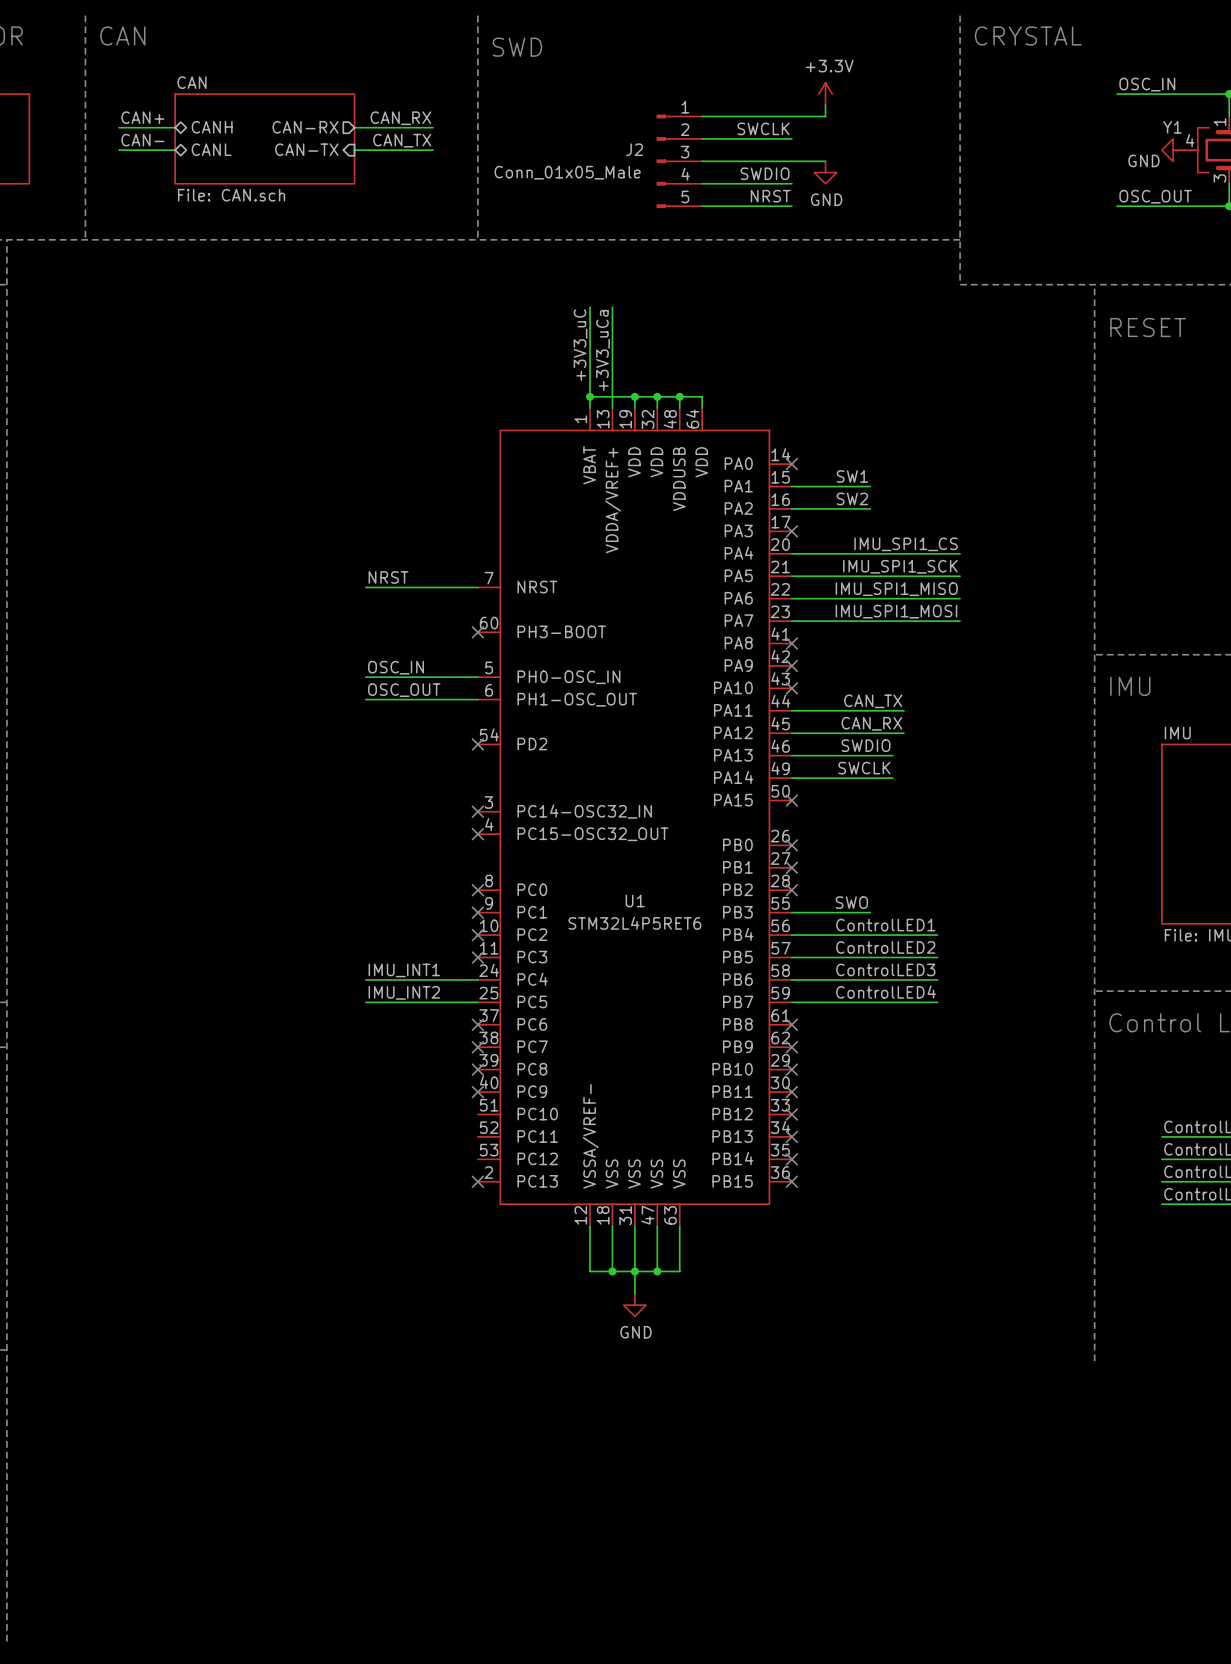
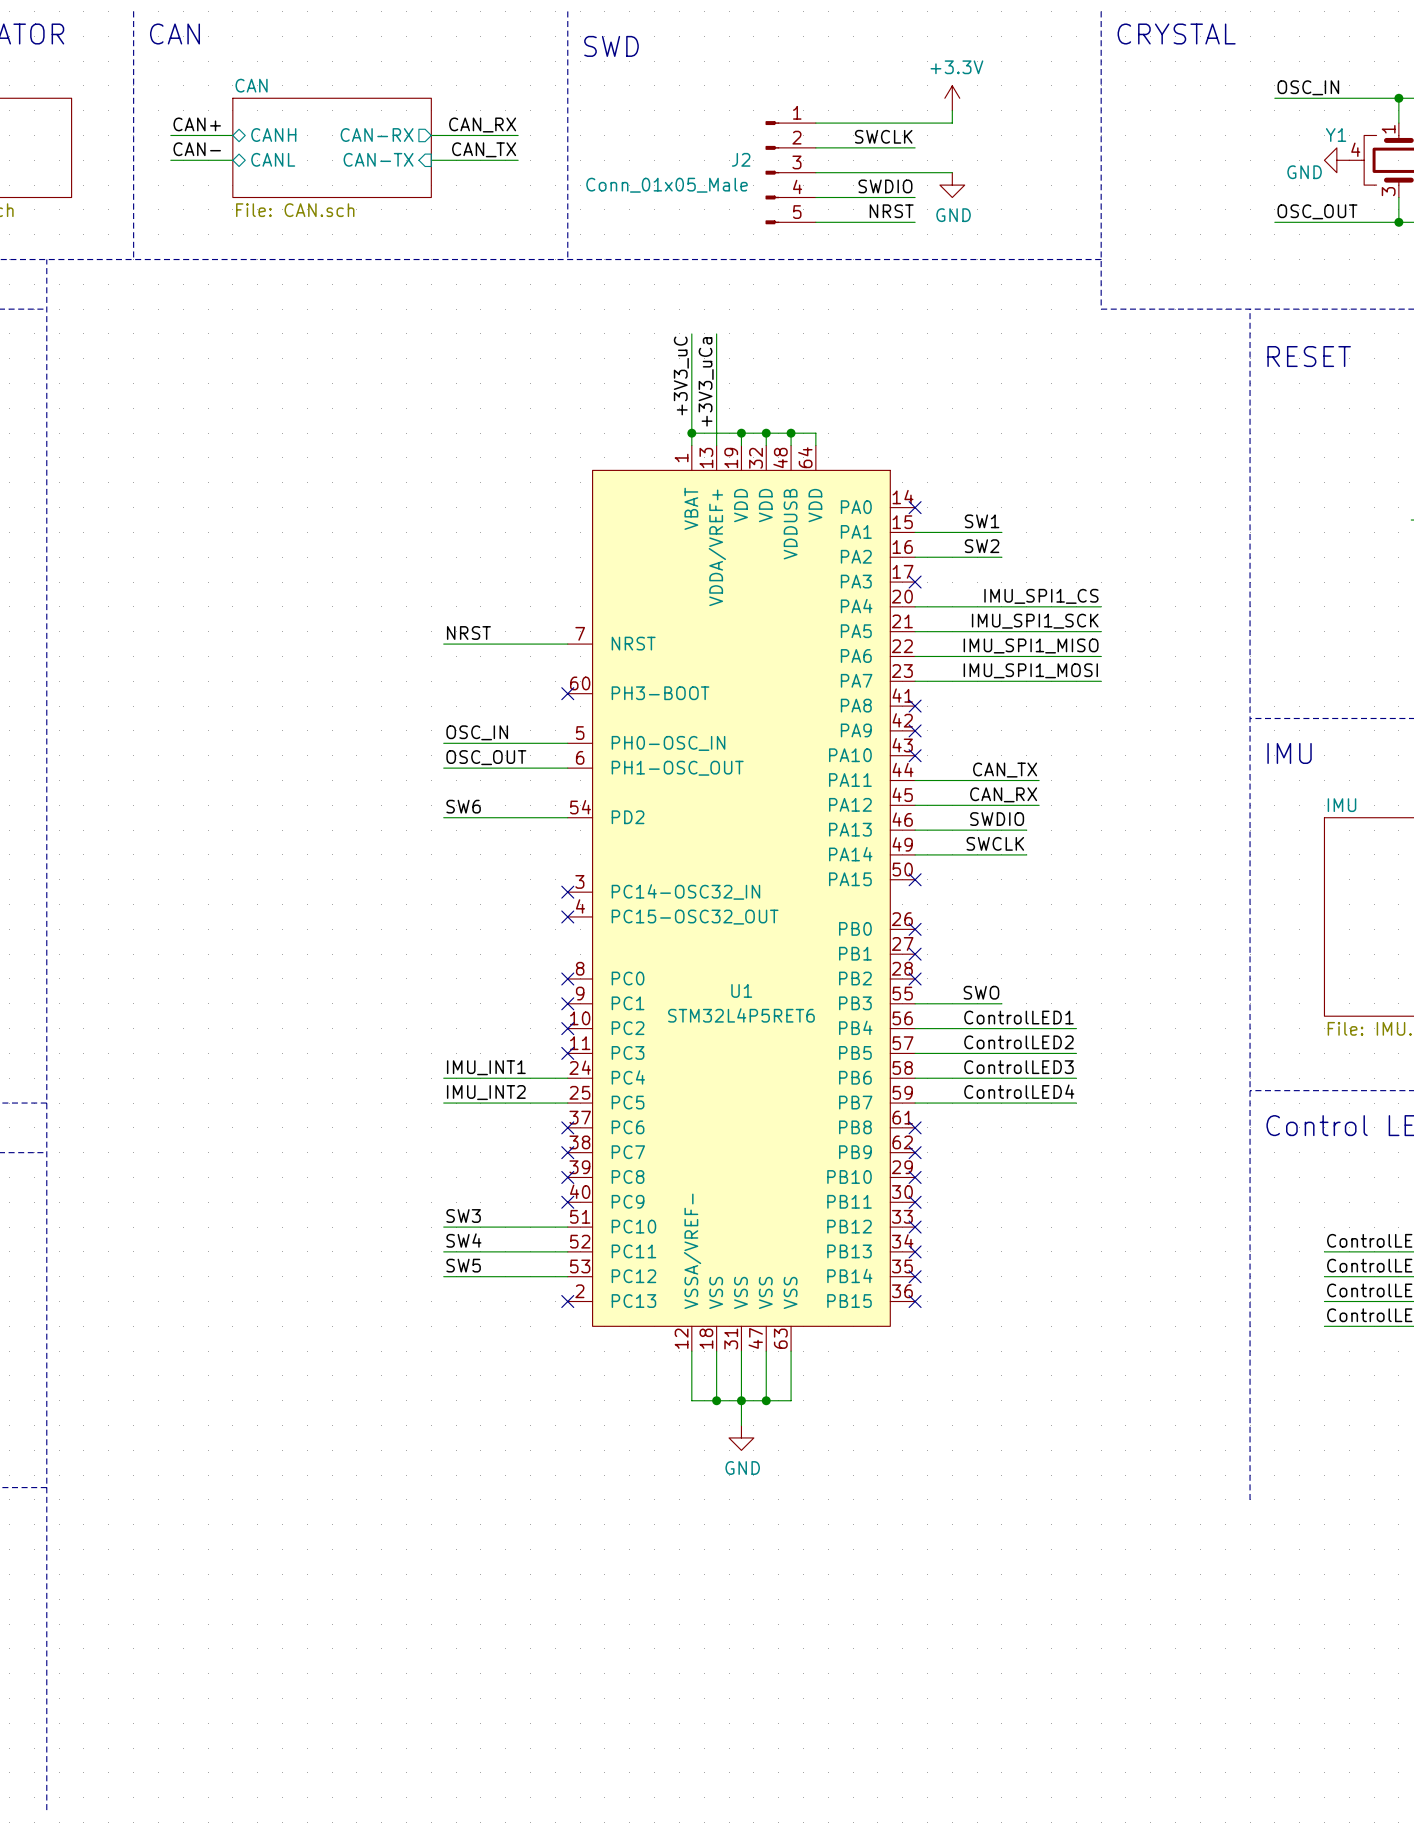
label: none -> SW6 (463, 806)
wire: none -> (443, 817) (567, 817)
no-connect mark: (477, 744) -> none
label: none -> SW3 (463, 1216)
wire: none -> (443, 1227) (567, 1227)
label: none -> SW4 (463, 1240)
wire: none -> (443, 1251) (567, 1251)
label: none -> SW5 (463, 1265)
wire: none -> (443, 1276) (567, 1276)

